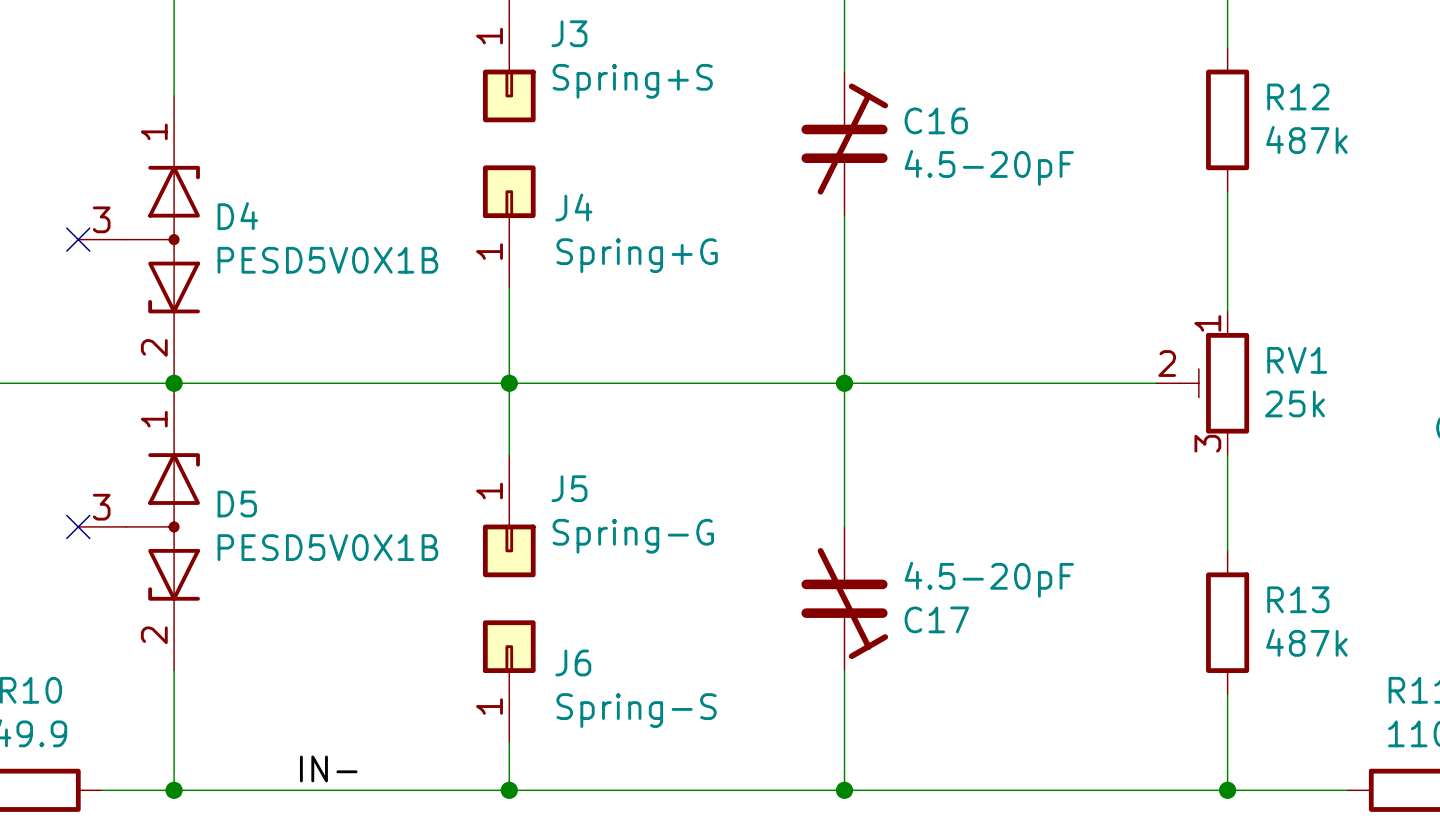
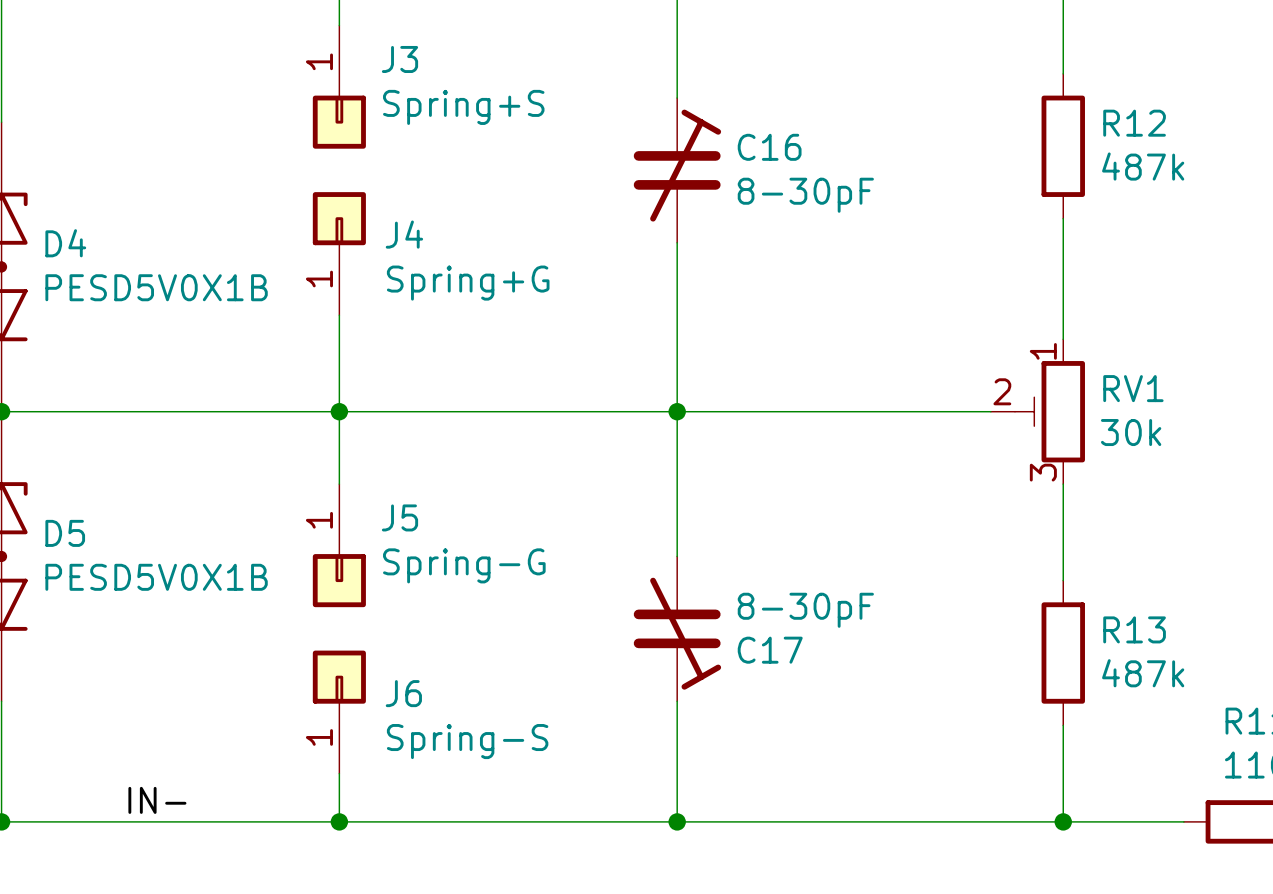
C16 value: 4.5-20pF (989, 167) -> 8-30pF (805, 195)
RV1 value: 25k (1294, 403) -> 30k (1131, 432)
C17 value: 4.5-20pF (989, 579) -> 8-30pF (805, 610)

